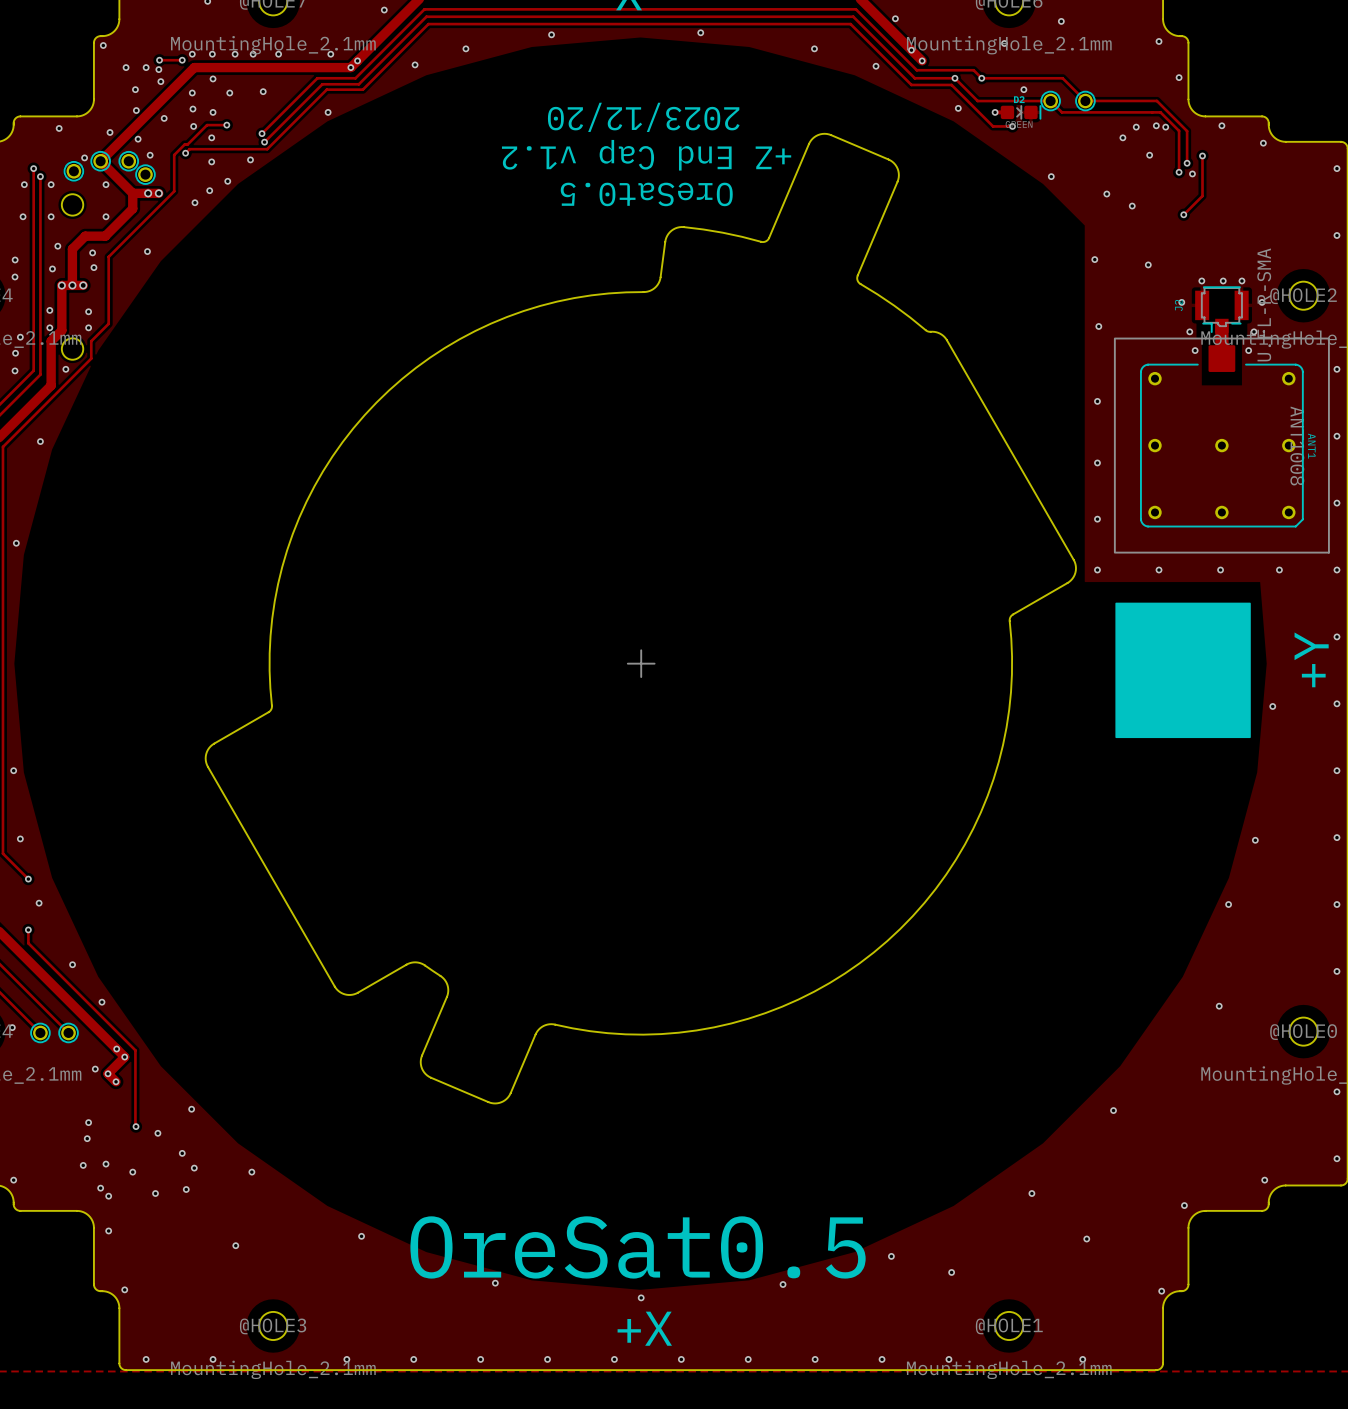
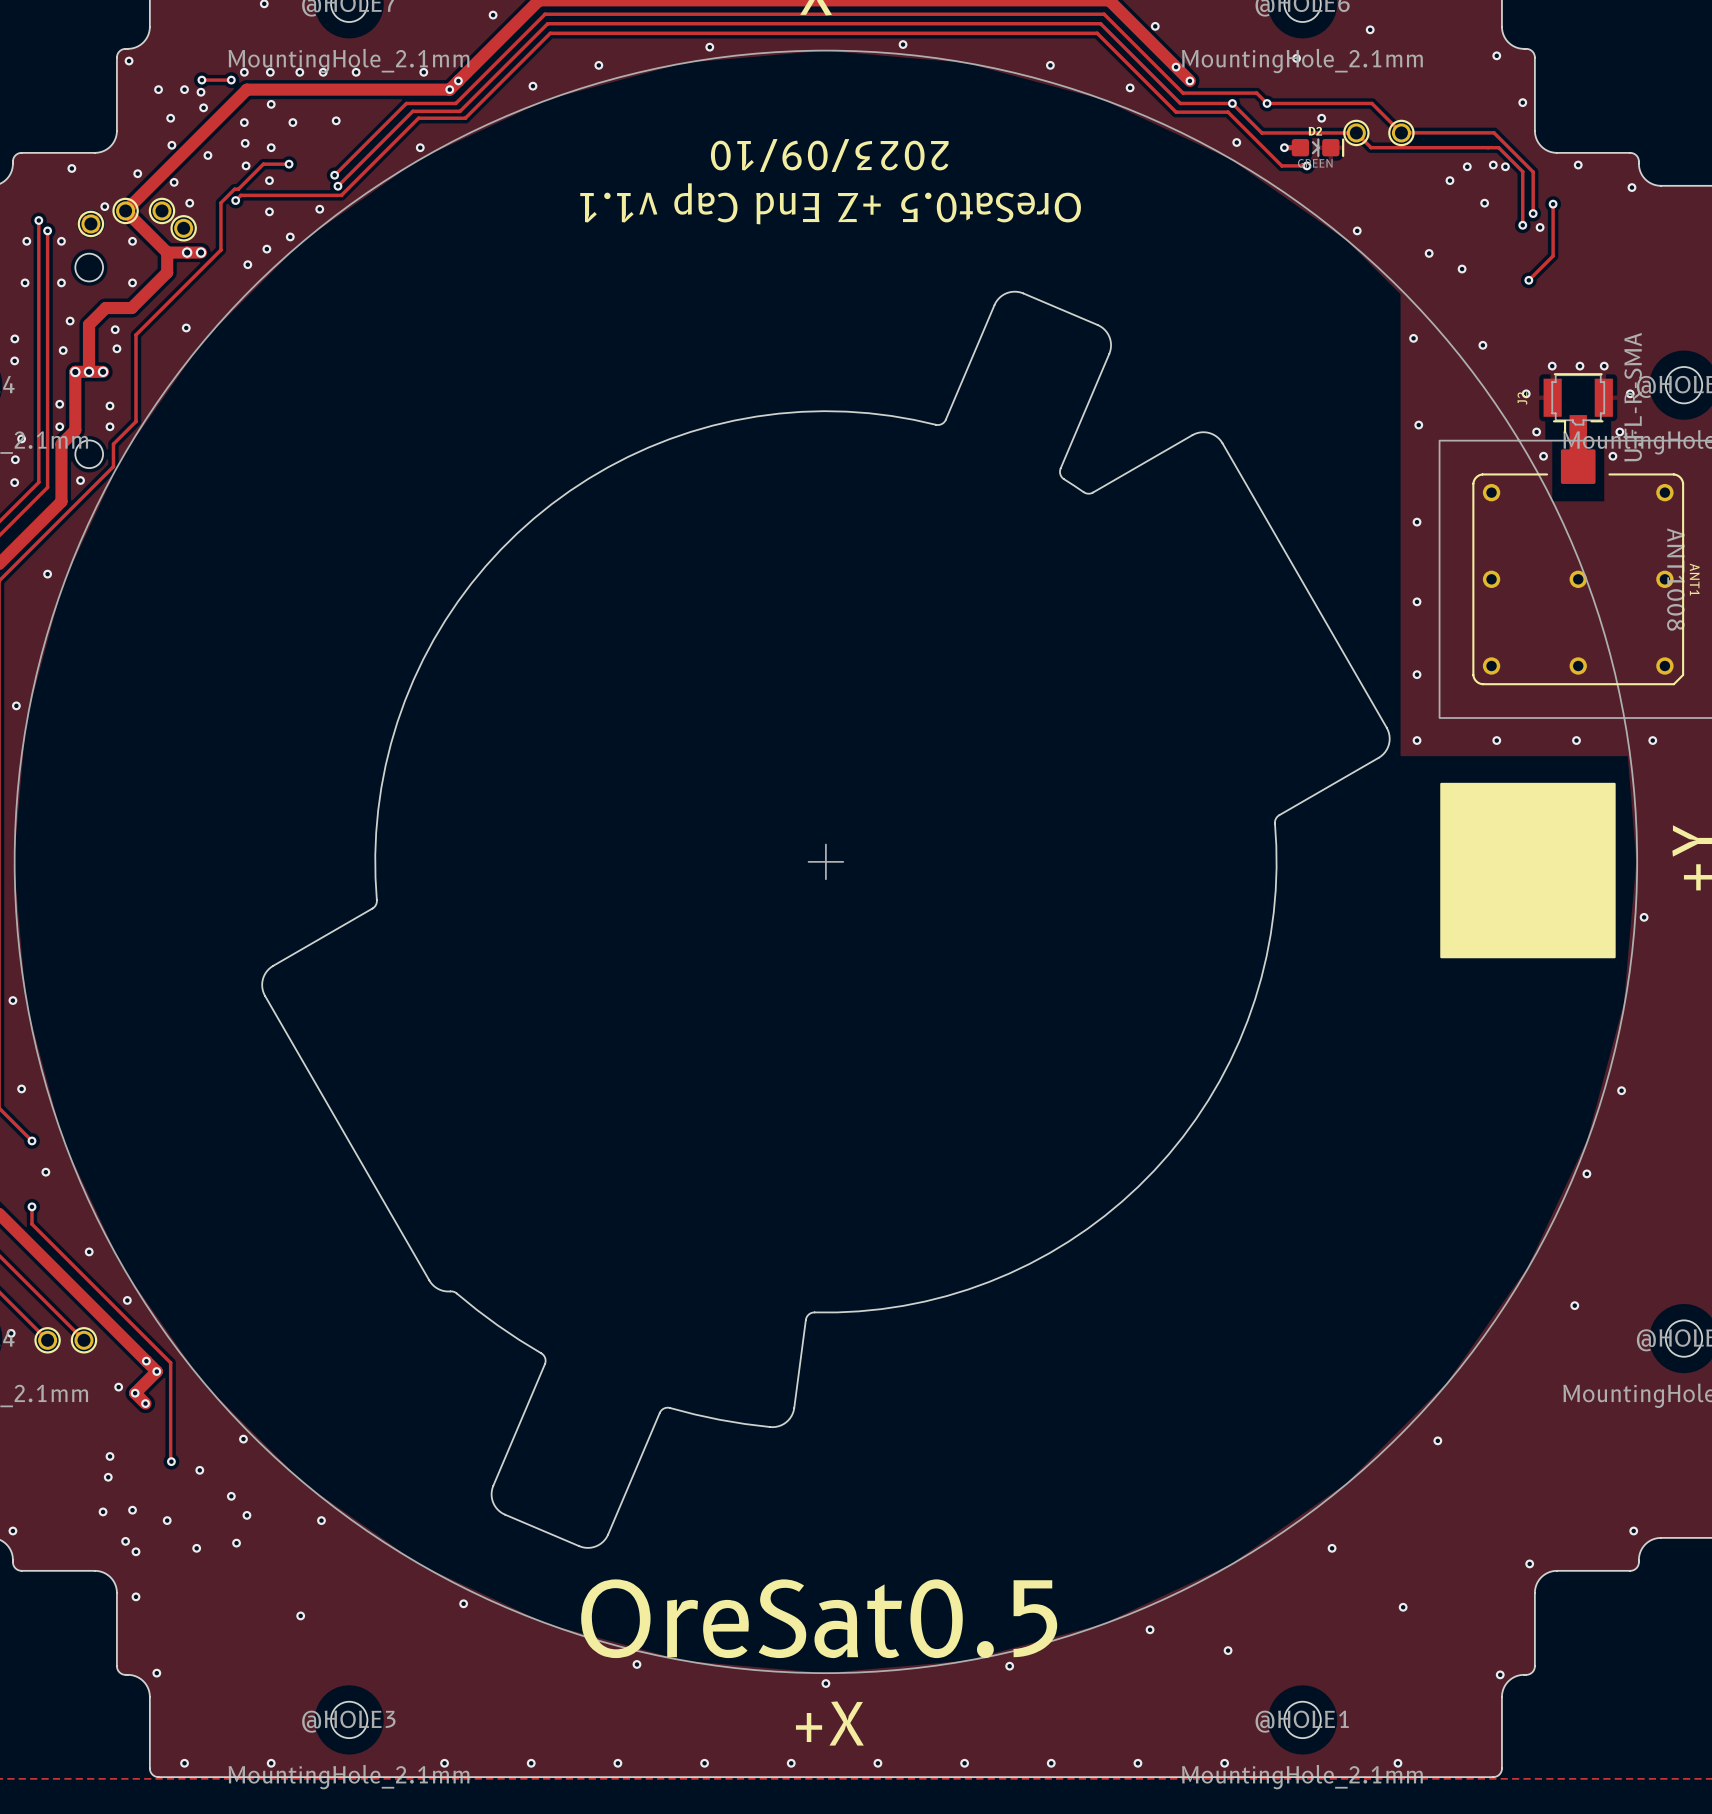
drawing: none -> [13, 49, 1639, 1675]
text: 2023/12/20 (643, 117) -> 2023/09/10 (829, 155)
board edge: (831, 135) (890, 160) (895, 164) (898, 173) (897, 181) (857, 275) (858, 281) (894, 305) (926, 330) (938, 332) (945, 338) (1073, 559) (1076, 568) (1074, 574) (1067, 583) (1010, 617) (1011, 674) (1009, 709) (998, 762) (987, 796) (965, 844) (946, 874) (924, 902) (887, 941) (859, 963) (814, 991) (765, 1013) (731, 1023) (696, 1030) (643, 1034) (607, 1033) (553, 1024) (545, 1025) (536, 1032) (508, 1096) (499, 1102) (490, 1102) (431, 1077) (421, 1068) (421, 1057) (448, 993) (447, 985) (442, 977) (423, 964) (414, 962) (406, 964) (354, 994) (343, 993) (335, 988) (207, 766) (205, 760) (206, 751) (214, 743) (271, 709) (269, 653) (272, 618) (278, 584) (287, 550) (299, 517) (323, 471) (342, 442) (376, 402) (402, 378) (430, 357) (475, 331) (507, 316) (540, 305) (574, 298) (651, 290) (660, 279) (666, 237) (675, 228) (683, 227) (703, 229) (761, 241) (766, 241) (809, 142) (820, 134) (831, 135) -> (1023, 293) (1013, 291) (1006, 293) (995, 302) (945, 419) (941, 424) (936, 424) (869, 413) (824, 411) (779, 413) (712, 425) (648, 447) (607, 467) (569, 491) (517, 533) (485, 566) (445, 620) (423, 659) (404, 700) (390, 743) (381, 787) (376, 832) (375, 905) (273, 965) (263, 976) (262, 987) (265, 995) (430, 1282) (440, 1290) (456, 1292) (497, 1325) (544, 1356) (544, 1364) (493, 1485) (491, 1497) (496, 1507) (502, 1513) (579, 1546) (593, 1547) (601, 1543) (606, 1537) (663, 1409) (669, 1407) (719, 1419) (770, 1427) (778, 1426) (788, 1420) (793, 1410) (805, 1319) (809, 1313) (859, 1311) (903, 1305) (946, 1296) (989, 1281) (1029, 1263) (1068, 1241) (1104, 1215) (1138, 1186) (1168, 1154) (1196, 1118) (1219, 1081) (1247, 1020) (1261, 978) (1270, 934) (1275, 890) (1275, 818) (1378, 757) (1388, 747) (1389, 738) (1386, 727) (1217, 437) (1206, 432) (1194, 434) (1091, 493) (1084, 492) (1061, 477) (1060, 469) (1109, 353) (1110, 339) (1106, 331) (1100, 326) (1023, 293)
text: +Z End Cap v1.2 (646, 155) -> OreSat0.5 +Z End Cap v1.1 (830, 203)
text: OreSat0.5 (646, 194) -> none

